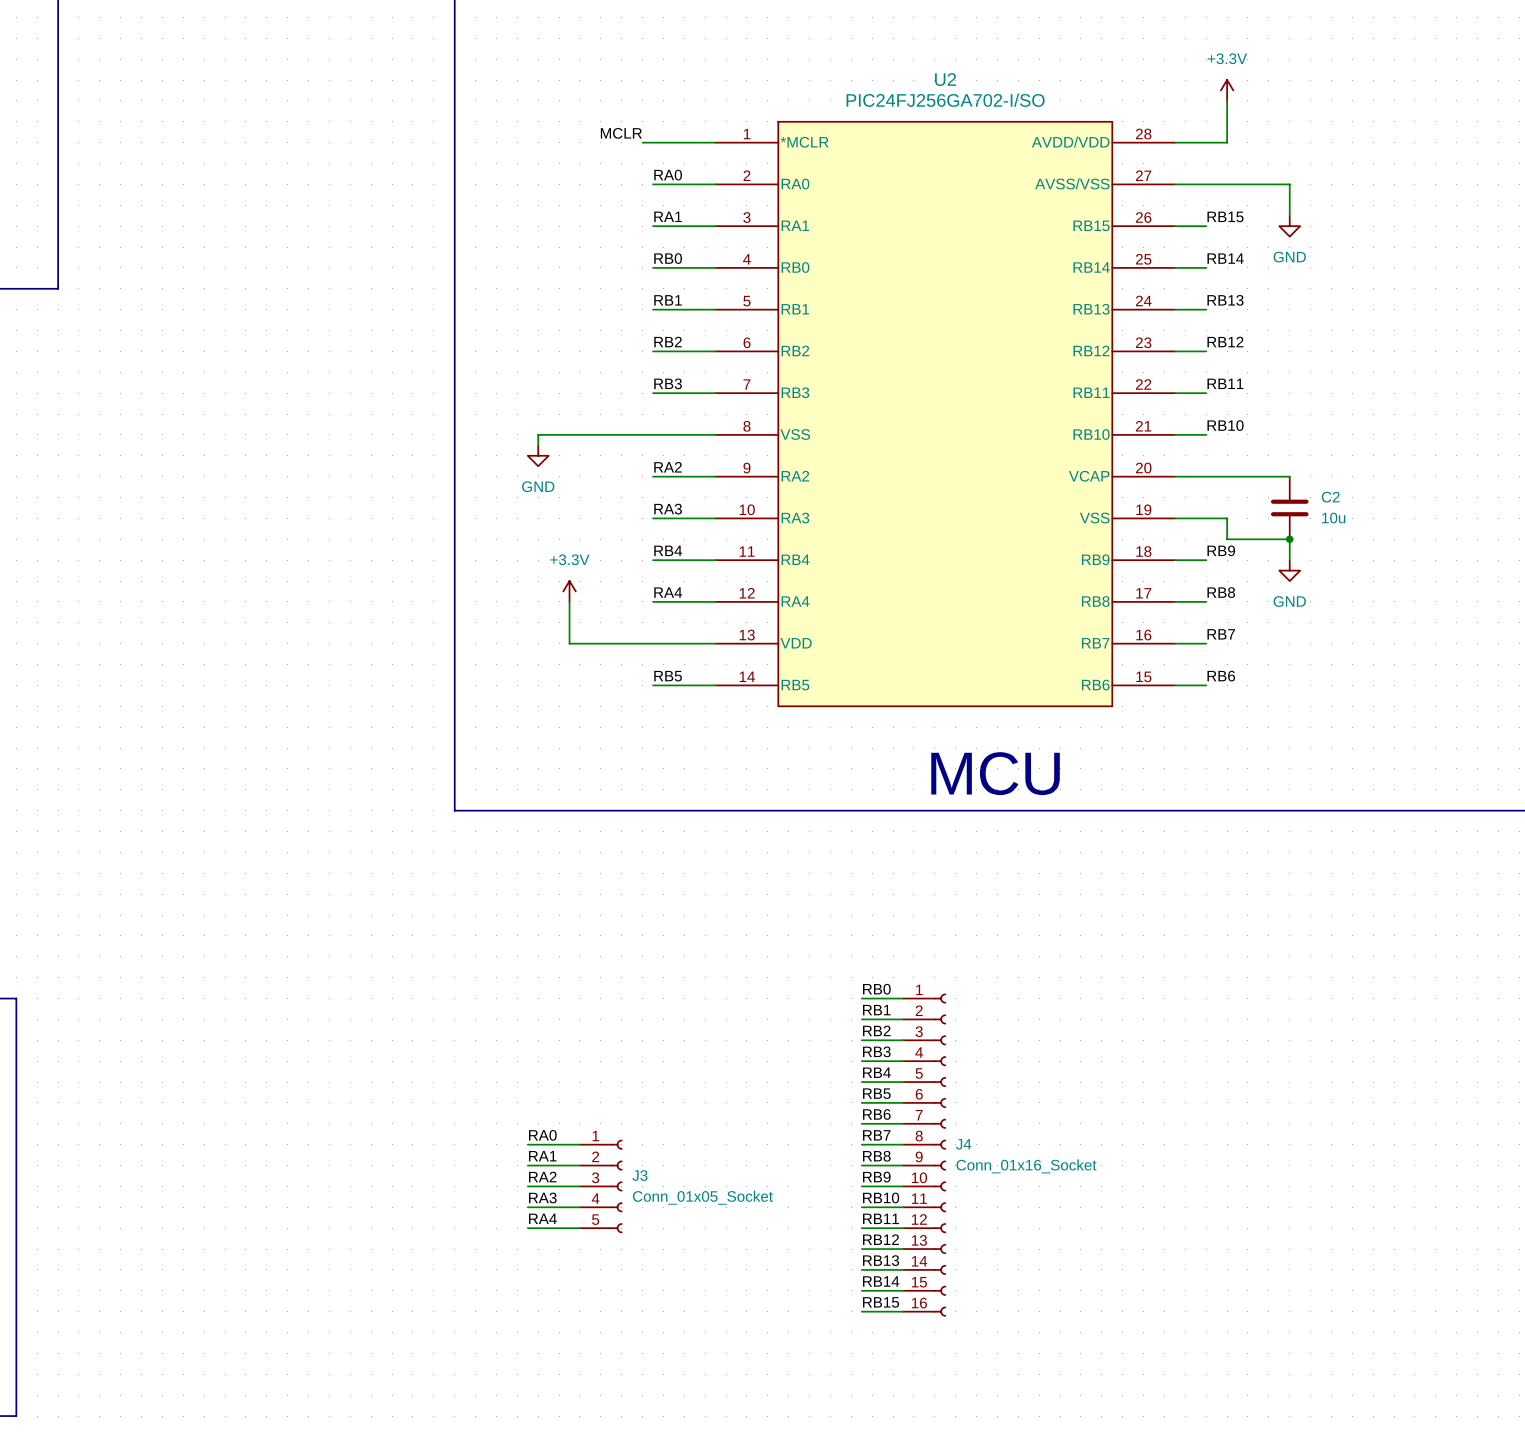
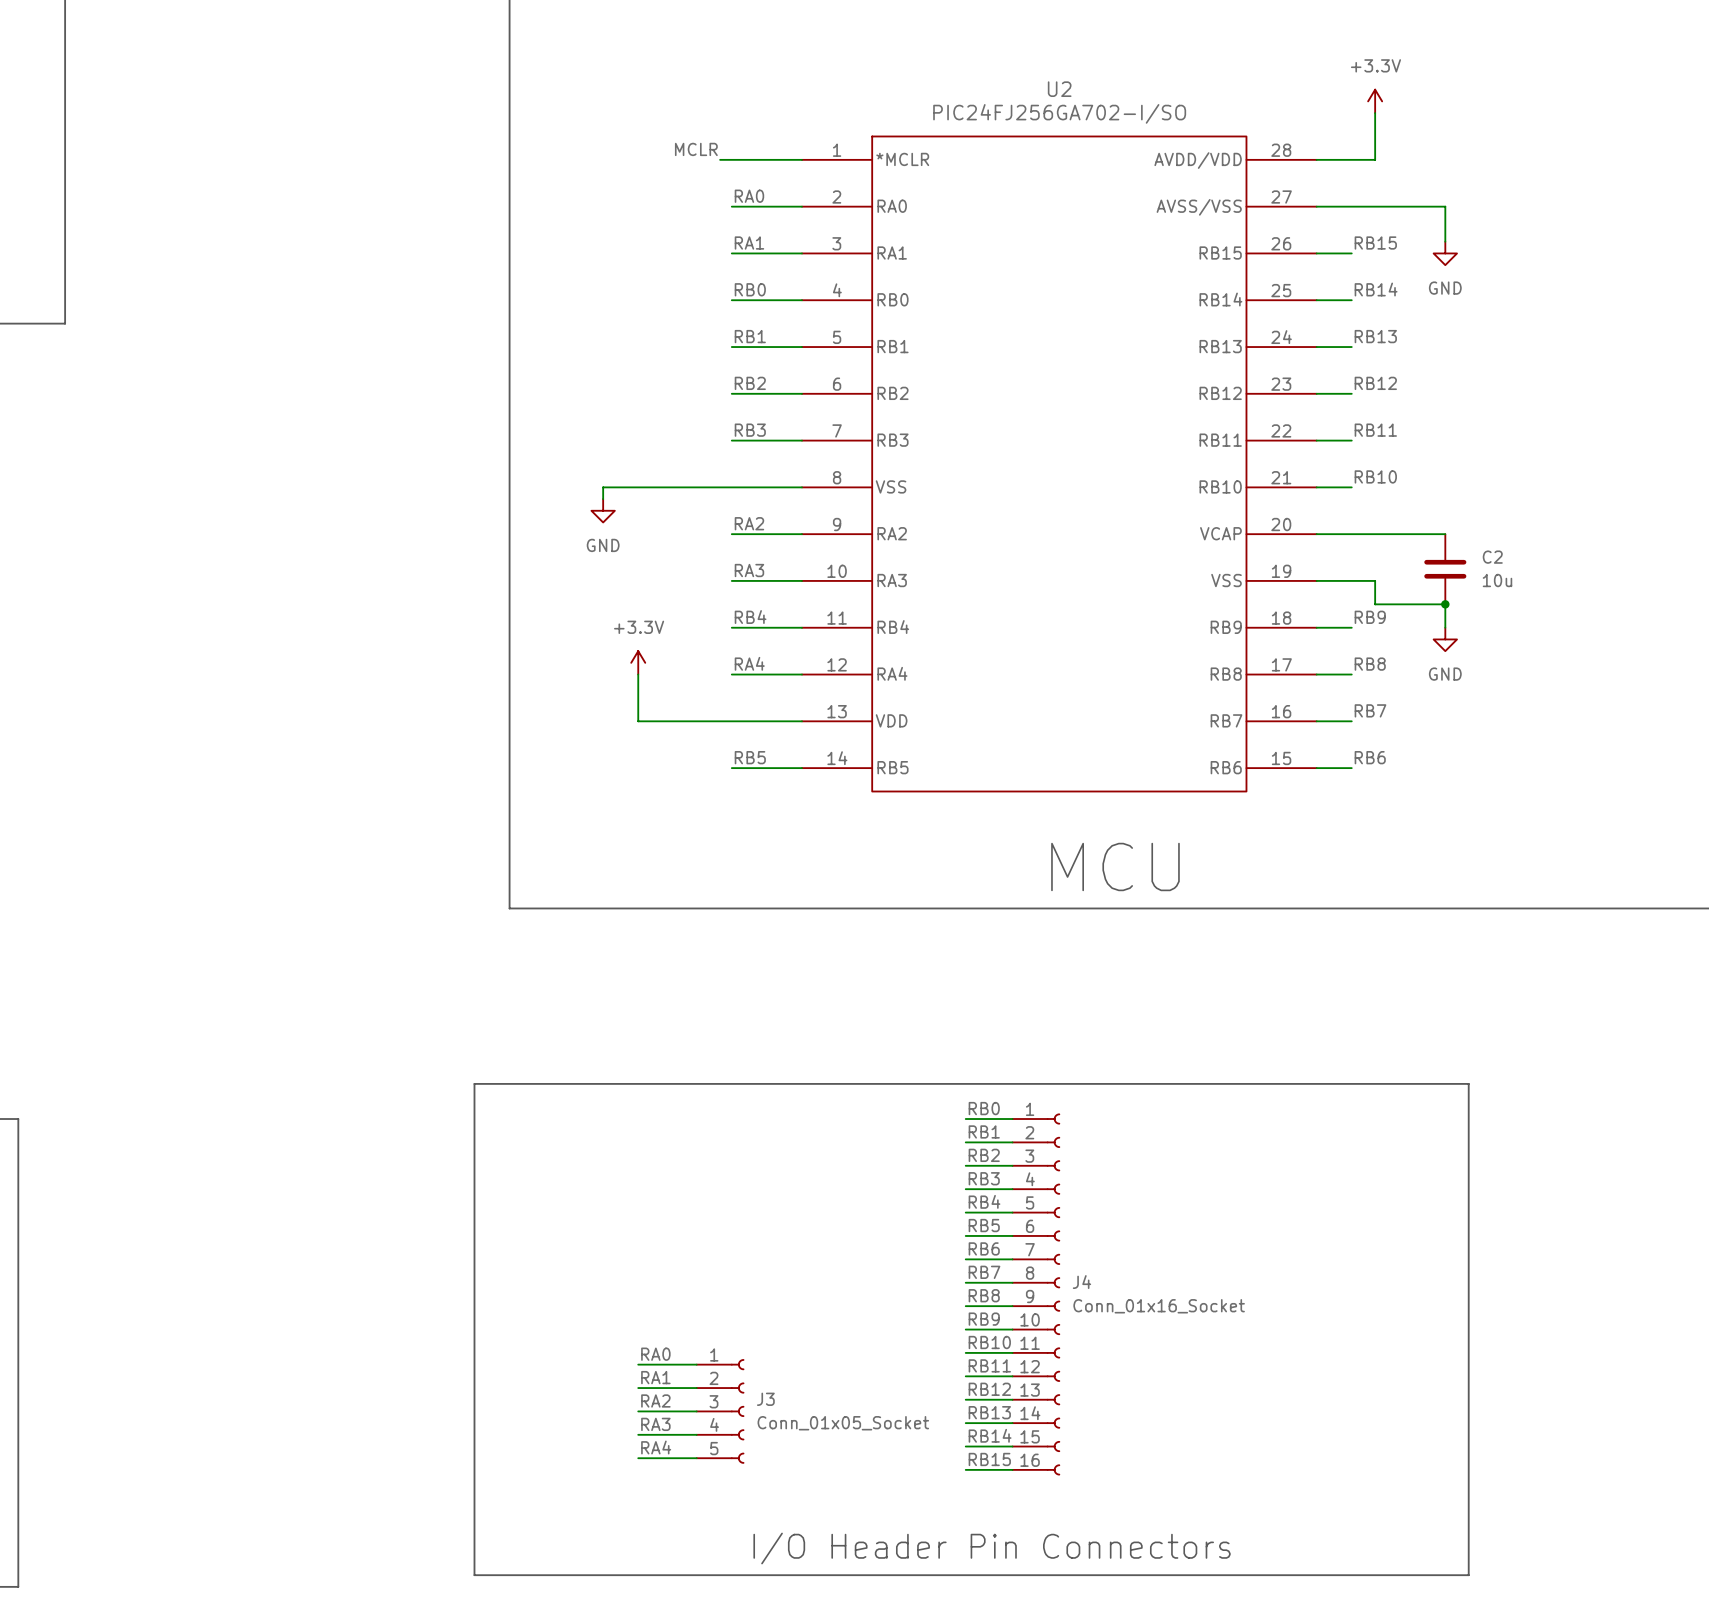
line: none -> (474, 1083) (1468, 1083) (1468, 1575) (474, 1575) (474, 1083)
label position: RA0 (542, 1135) -> RA0 (655, 1354)
wire: (527, 1144) (579, 1144) -> (638, 1364) (696, 1364)
label position: RA1 (542, 1156) -> RA1 (655, 1377)
wire: (527, 1165) (579, 1165) -> (638, 1388) (696, 1388)
label position: RA2 (542, 1177) -> RA2 (655, 1400)
wire: (527, 1186) (579, 1186) -> (638, 1411) (696, 1411)
J3 position: (601, 1186) -> (720, 1411)
label position: RA3 (542, 1197) -> RA3 (655, 1424)
wire: (527, 1207) (579, 1207) -> (638, 1434) (696, 1434)
label position: RA4 (542, 1218) -> RA4 (656, 1447)
wire: (527, 1228) (579, 1228) -> (638, 1458) (696, 1458)
text: none -> I/O Header Pin Connectors (992, 1548)

